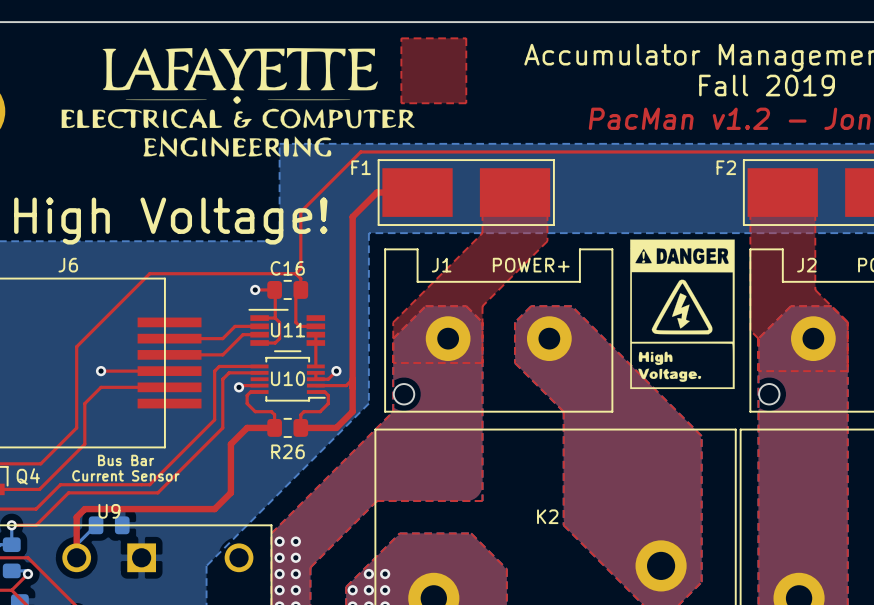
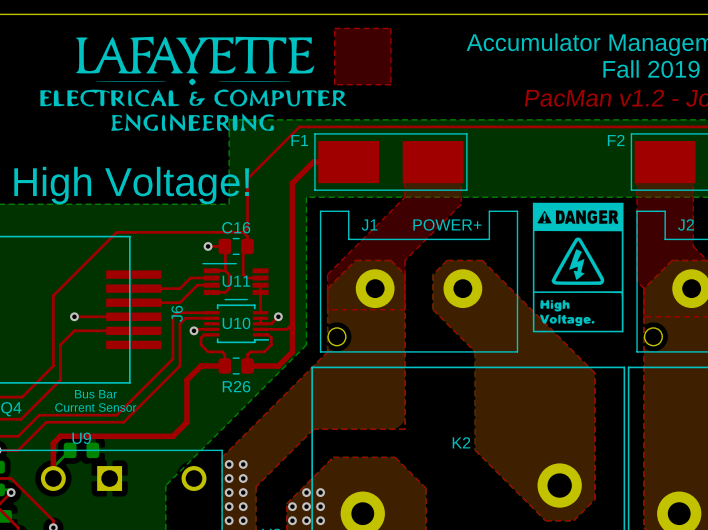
J6 name rotation: 0° (68, 265) -> 90° counterclockwise (177, 313)
J6 name position: J6 (68, 265) -> J6 (177, 313)

